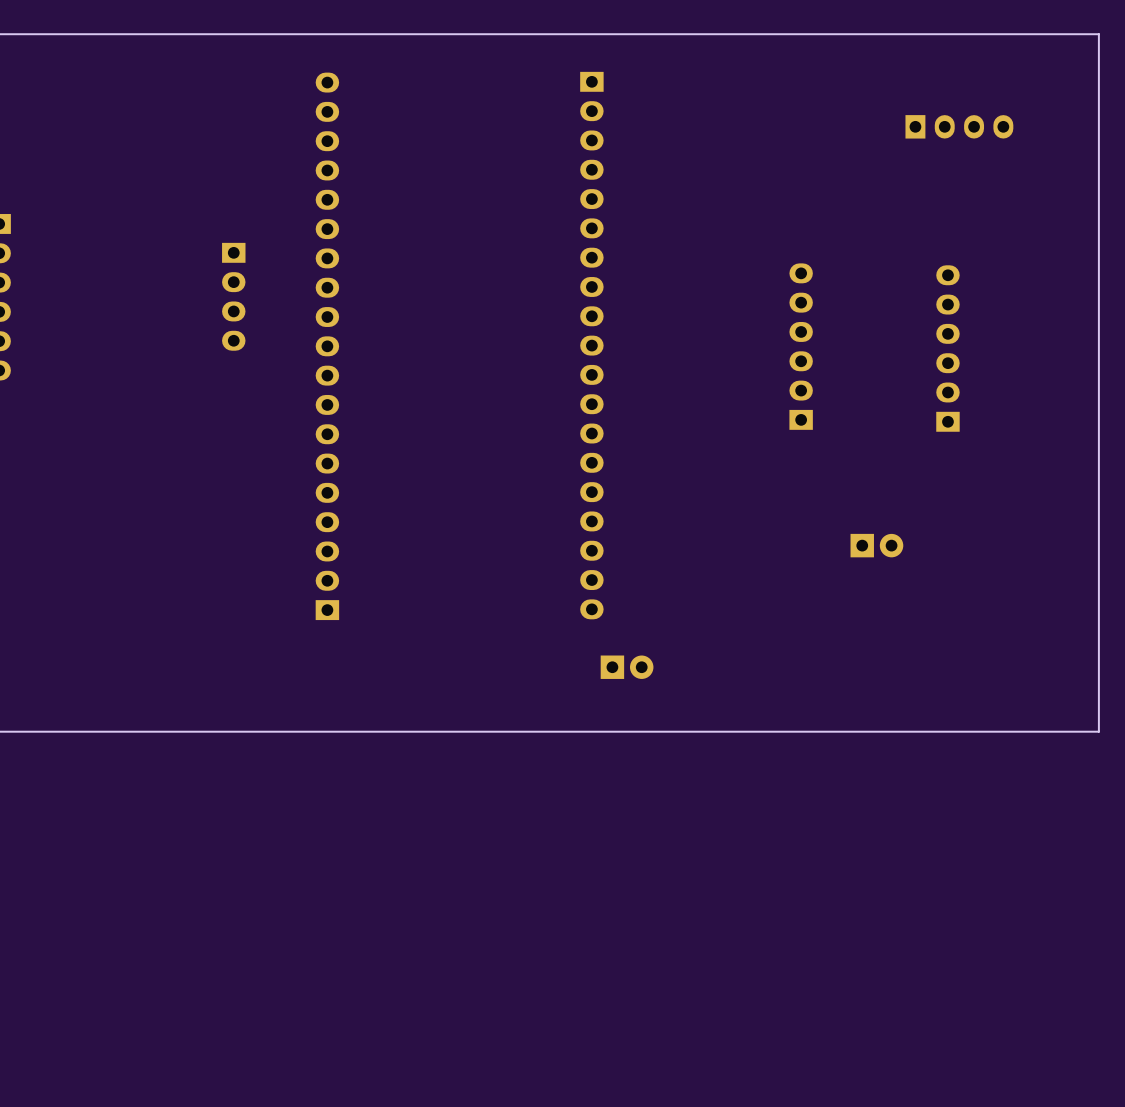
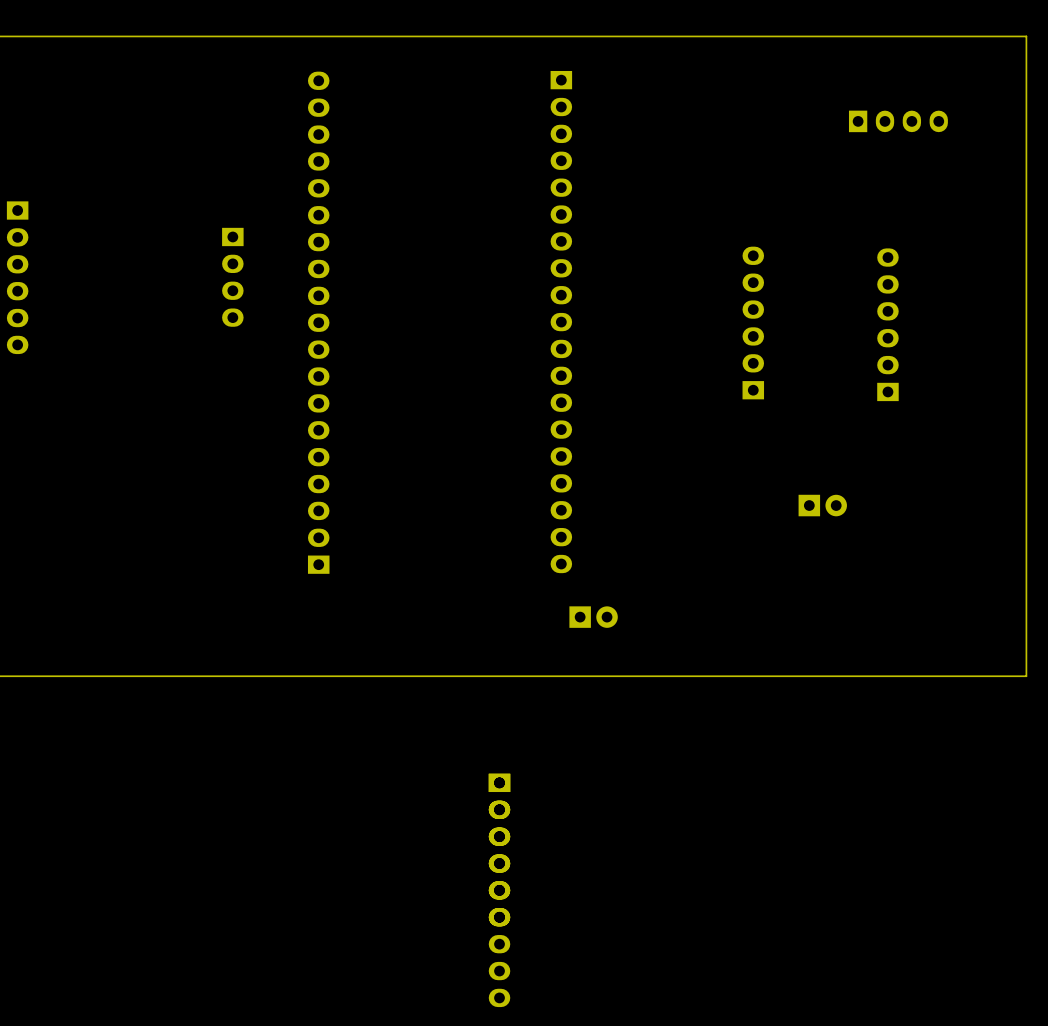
part: none -> (499, 850)
part: none -> (499, 890)

